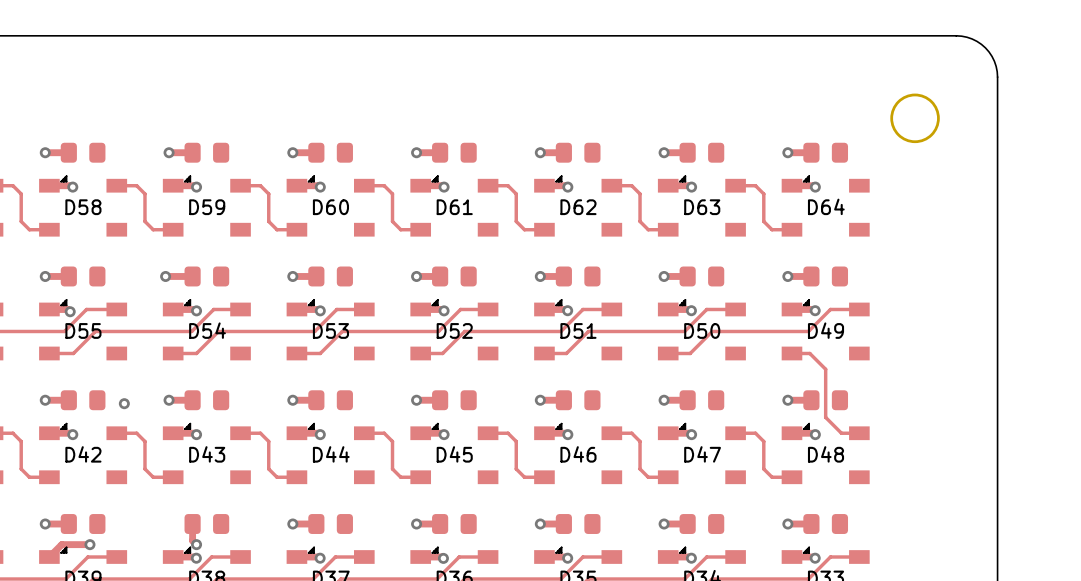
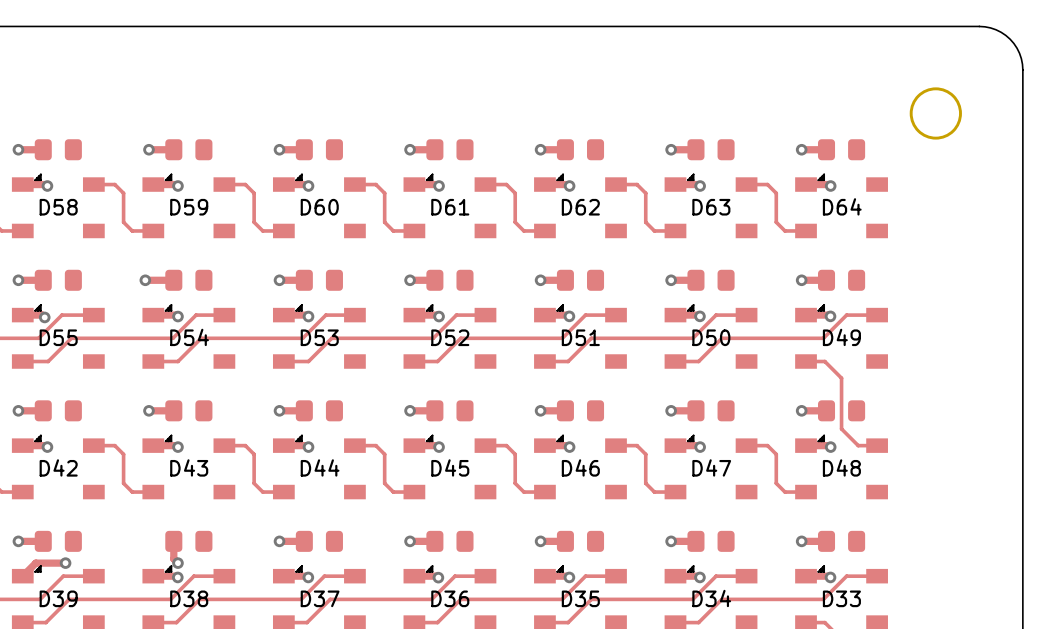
via: (124, 403) -> none

